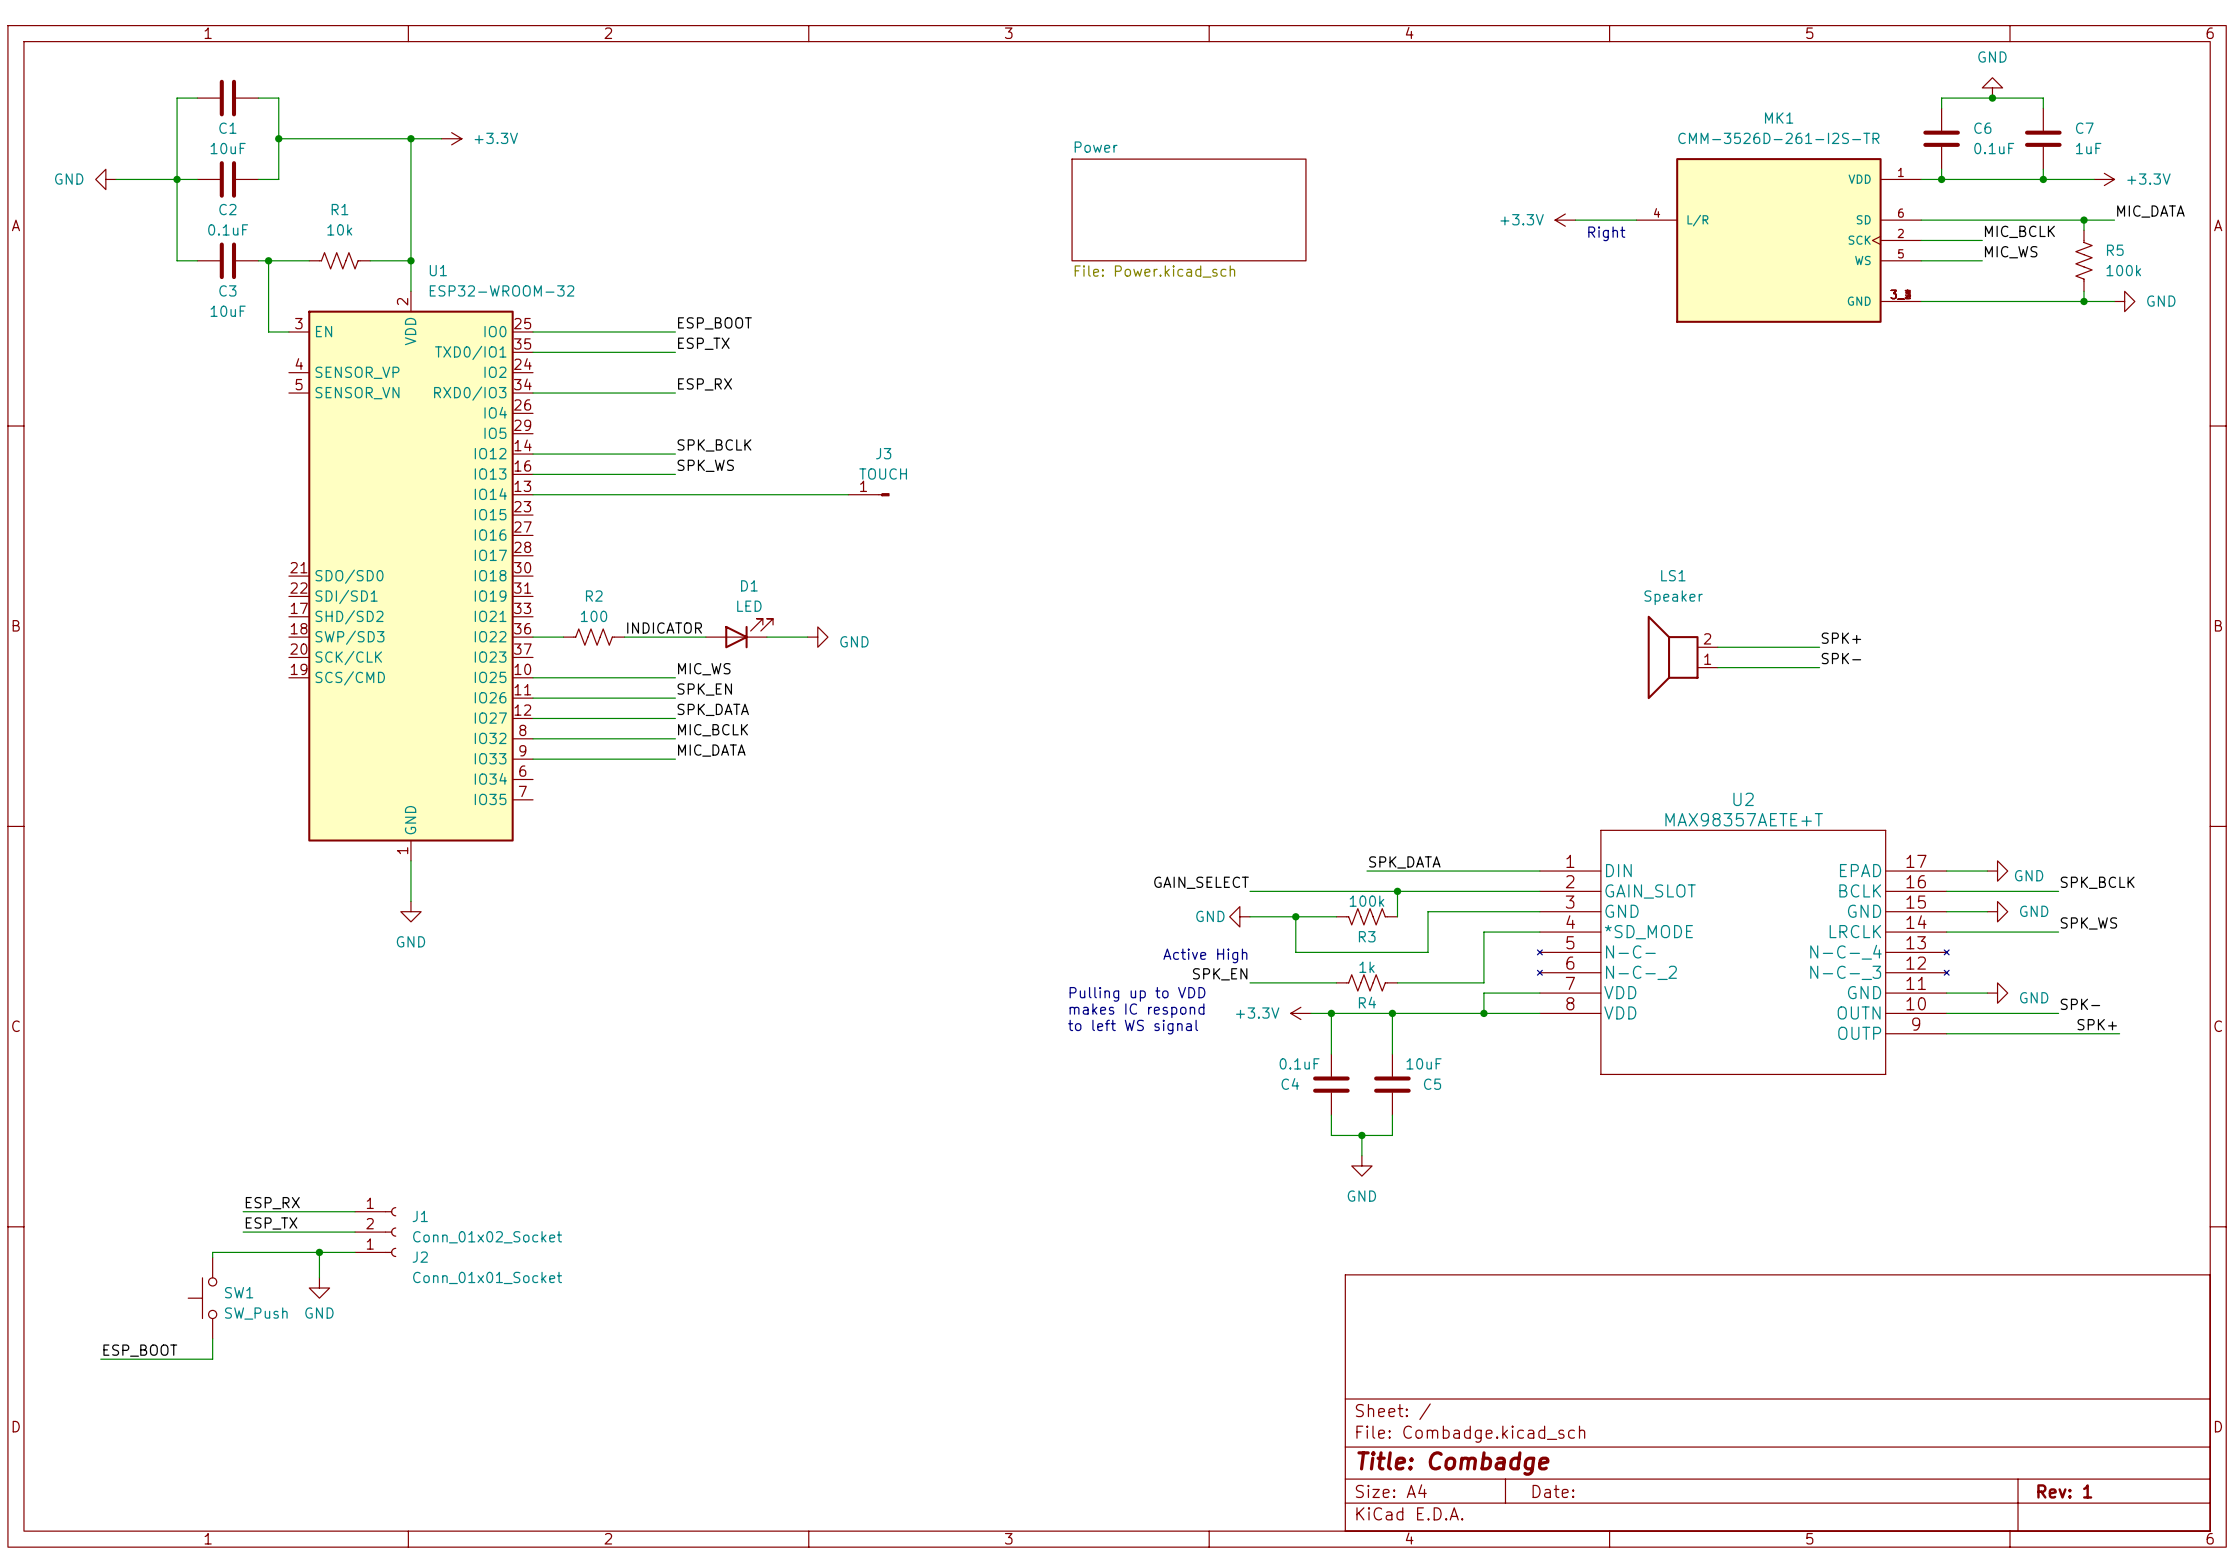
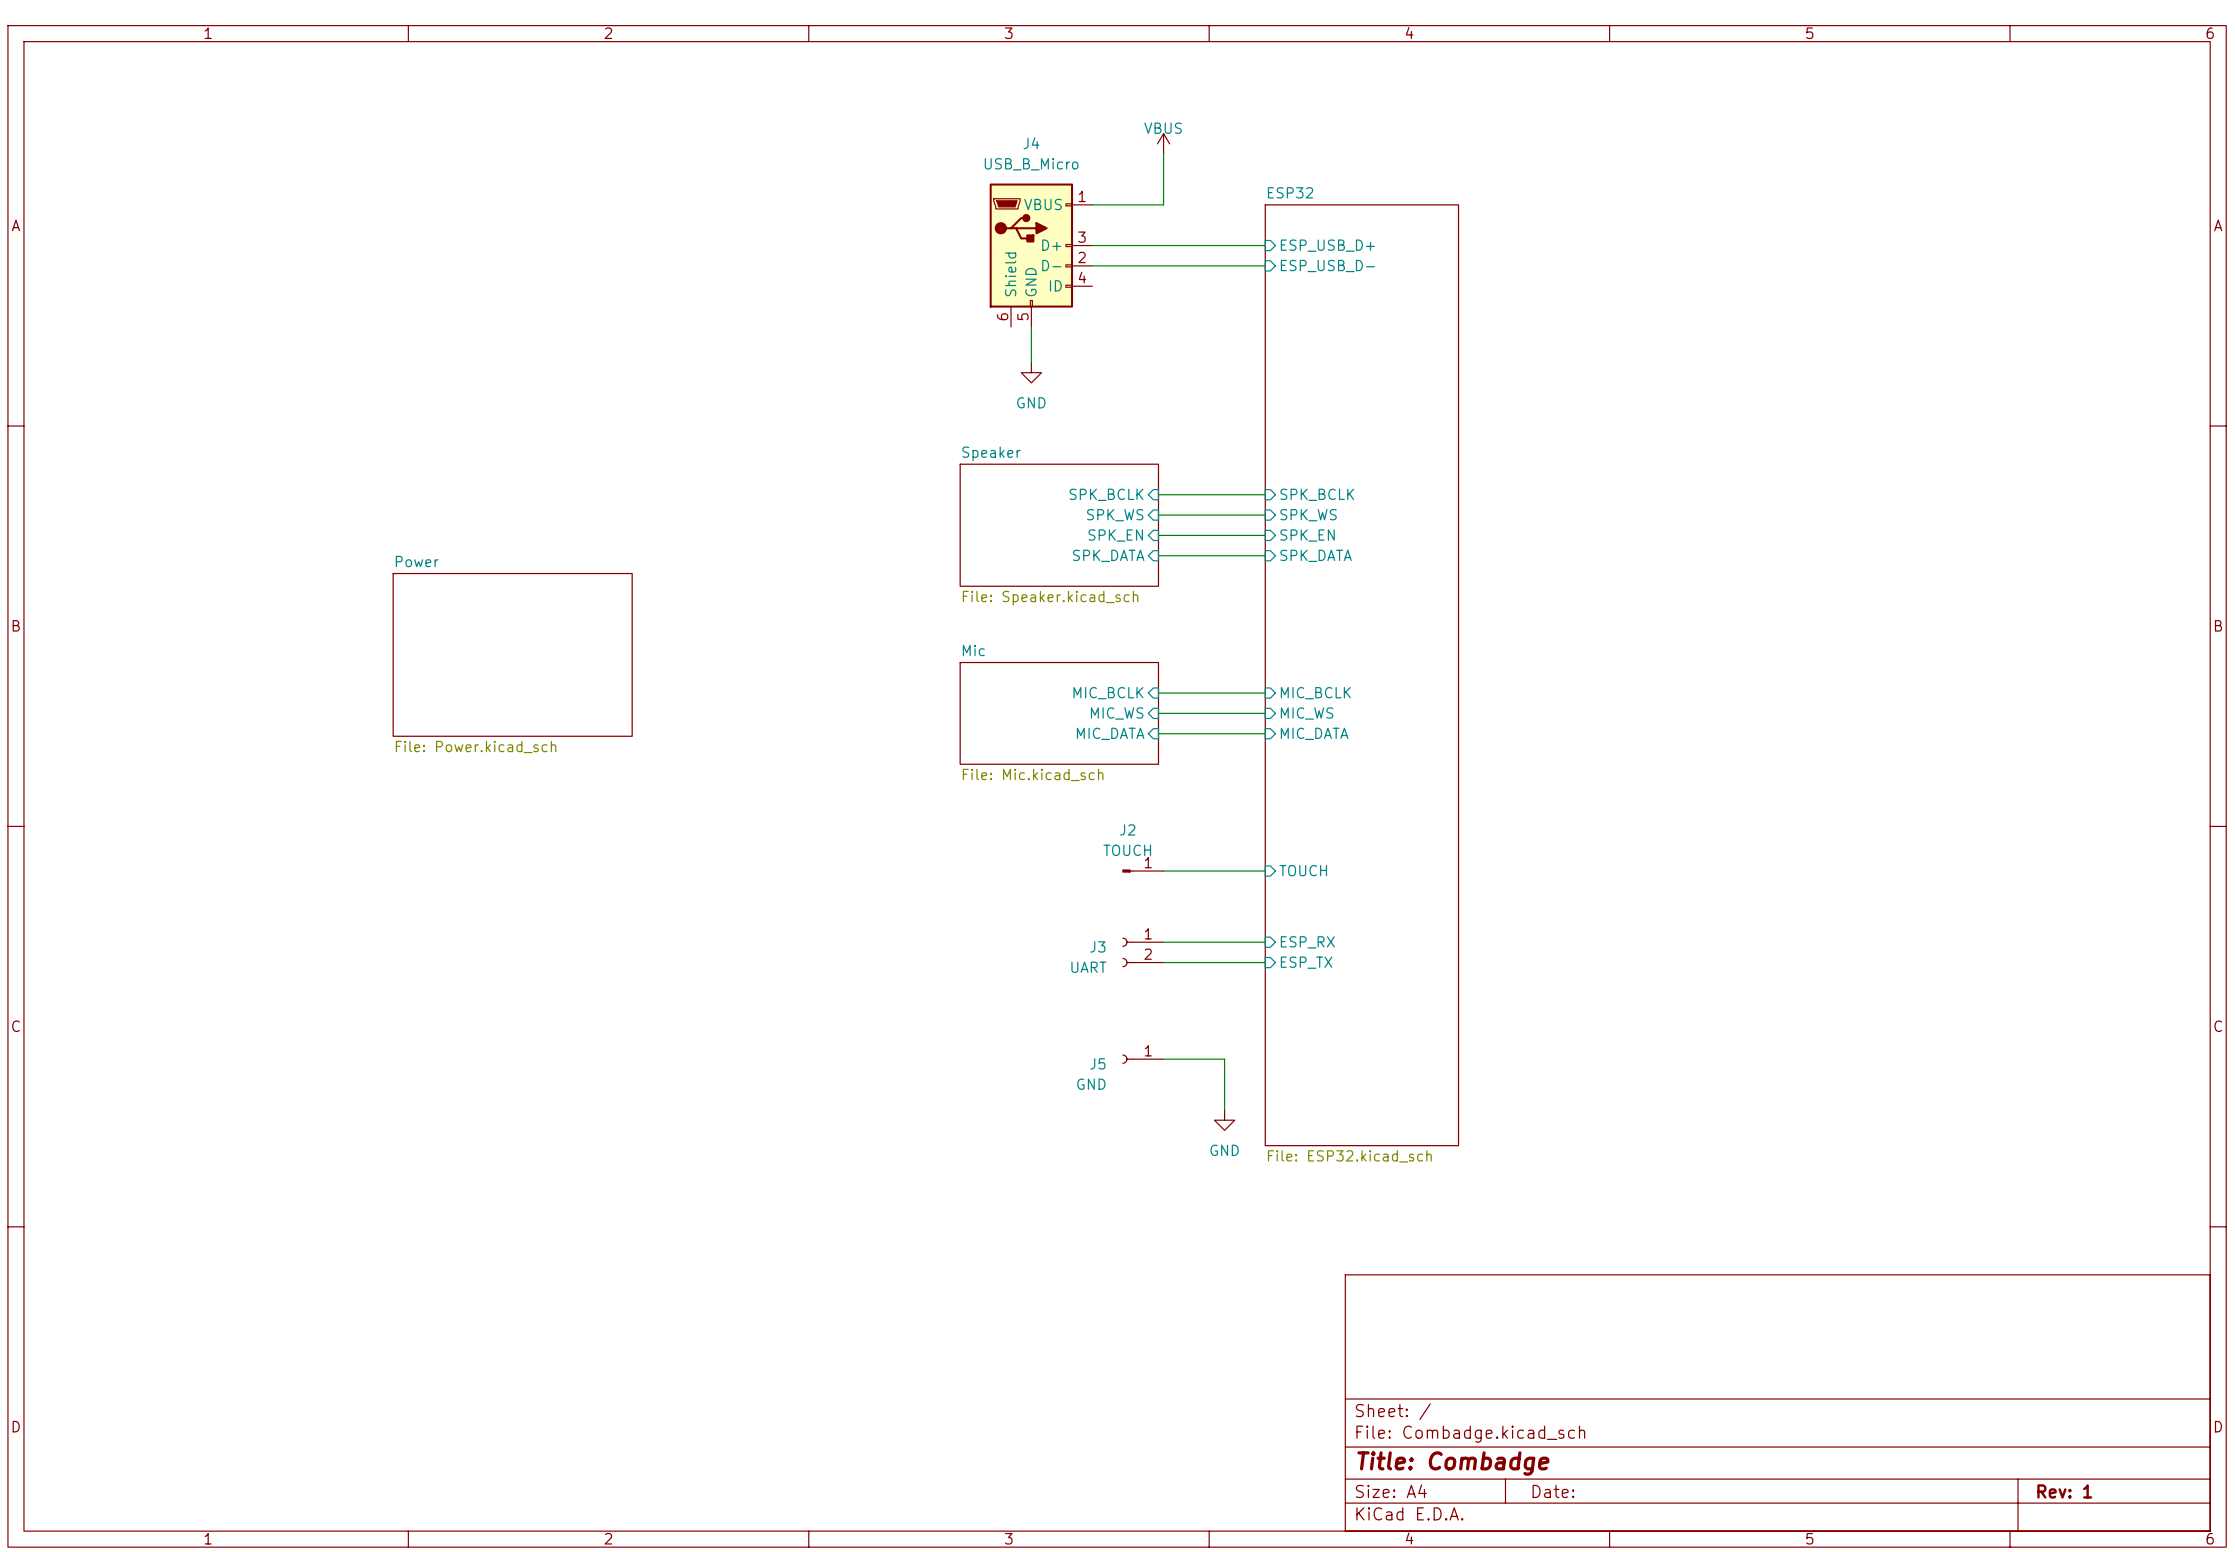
power symbol: GND (1992, 87) -> none
wire: (197, 98) (177, 98) (177, 260) (197, 260) -> none
C1: 10uF (227, 98) -> none
wire: (258, 98) (278, 98) (278, 179) (258, 179) -> none
junction: (1992, 98) -> none
wire: (1941, 108) (1941, 98) (2043, 98) (2043, 108) -> none
wire: (278, 138) (441, 138) -> none
junction: (278, 138) -> none
wire: (410, 138) (410, 291) -> none
junction: (410, 138) -> none
power symbol: +3.3V (451, 138) -> none
C6: 0.1uF (1941, 138) -> none
C7: 1uF (2043, 138) -> none
power symbol: none -> VBUS (1163, 143)
wire: none -> (1163, 154) (1163, 204) (1092, 204)
wire: (1941, 169) (1941, 179) -> none
wire: (2043, 169) (2043, 179) -> none
power symbol: GND (105, 179) -> none
wire: (116, 179) (197, 179) -> none
junction: (177, 179) -> none
C2: 0.1uF (227, 179) -> none
wire: (1921, 179) (2094, 179) -> none
junction: (1941, 179) -> none
junction: (2043, 179) -> none
power symbol: +3.3V (2104, 179) -> none
sheet Power: File: Power.kicad_sch (1189, 209) -> none
label: MIC_DATA (2150, 211) -> none
power symbol: +3.3V (1565, 220) -> none
wire: (1575, 220) (1636, 220) -> none
wire: (1921, 220) (2114, 220) -> none
wire: (2083, 220) (2083, 230) -> none
junction: (2083, 220) -> none
label: MIC_BCLK (2019, 231) -> none
text: Right (1606, 233) -> none
MK1: CMM-3526D-261-I2S-TR (1778, 240) -> none
wire: (1921, 240) (1982, 240) -> none
wire: none -> (1092, 245) (1265, 245)
sheet pin: none -> ESP_USB_D+ (1327, 245)
label: MIC_WS (2011, 252) -> none
J4: none -> USB_B_Micro (1041, 255)
C3: 10uF (227, 260) -> none
wire: (258, 260) (309, 260) -> none
wire: (268, 260) (268, 331) (288, 331) -> none
junction: (268, 260) -> none
R1: 10k (339, 260) -> none
wire: (370, 260) (410, 260) -> none
junction: (410, 260) -> none
wire: (1921, 260) (1982, 260) -> none
R5: 100k (2083, 260) -> none
wire: none -> (1092, 265) (1265, 265)
sheet pin: none -> ESP_USB_D- (1327, 265)
wire: (2083, 291) (2083, 301) -> none
wire: (1921, 301) (2114, 301) -> none
junction: (2083, 301) -> none
power symbol: GND (2124, 301) -> none
label: ESP_BOOT (714, 323) -> none
wire: none -> (1031, 326) (1031, 362)
wire: (533, 331) (675, 331) -> none
label: ESP_TX (703, 343) -> none
wire: (533, 352) (675, 352) -> none
power symbol: none -> GND (1031, 372)
label: ESP_RX (705, 384) -> none
wire: (533, 393) (675, 393) -> none
label: SPK_BCLK (714, 445) -> none
J3 name position: J3 (883, 453) -> J3 (1097, 946)
wire: (533, 454) (675, 454) -> none
label: SPK_WS (705, 465) -> none
wire: (533, 474) (675, 474) -> none
J3 value: TOUCH (883, 474) -> UART (1088, 967)
J3 symbol: [848, 493, 890, 497] -> [1122, 937, 1164, 968]
wire: (533, 494) (848, 494) -> none
sheet pin: none -> SPK_BCLK (1106, 494)
wire: none -> (1158, 494) (1265, 494)
sheet pin: none -> SPK_BCLK (1317, 494)
sheet pin: none -> SPK_WS (1115, 515)
wire: none -> (1158, 515) (1265, 515)
sheet pin: none -> SPK_WS (1308, 515)
sheet Speaker: none -> File: Speaker.kicad_sch (1059, 525)
sheet pin: none -> SPK_EN (1115, 535)
wire: none -> (1158, 535) (1265, 535)
sheet pin: none -> SPK_EN (1307, 535)
sheet pin: none -> SPK_DATA (1108, 555)
wire: none -> (1158, 555) (1265, 555)
sheet pin: none -> SPK_DATA (1316, 555)
U1: ESP32-WROOM-32 (410, 576) -> none
label: INDICATOR (664, 628) -> none
D1: LED (739, 633) -> none
wire: (533, 637) (563, 637) -> none
R2: 100 (594, 637) -> none
wire: (624, 637) (705, 637) -> none
wire: (766, 637) (807, 637) -> none
power symbol: GND (817, 637) -> none
label: SPK+ (1841, 638) -> none
wire: (1717, 647) (1819, 647) -> none
sheet Power: none -> File: Power.kicad_sch (512, 654)
LS1: Speaker (1682, 657) -> none
label: SPK- (1841, 658) -> none
wire: (1717, 667) (1819, 667) -> none
label: MIC_WS (704, 669) -> none
sheet ESP32: none -> File: ESP32.kicad_sch (1361, 675)
wire: (533, 677) (675, 677) -> none
label: SPK_EN (704, 689) -> none
sheet pin: none -> MIC_BCLK (1108, 693)
wire: none -> (1158, 693) (1265, 693)
sheet pin: none -> MIC_BCLK (1315, 693)
wire: (533, 698) (675, 698) -> none
label: SPK_DATA (713, 709) -> none
sheet Mic: none -> File: Mic.kicad_sch (1059, 713)
sheet pin: none -> MIC_WS (1117, 713)
wire: none -> (1158, 713) (1265, 713)
sheet pin: none -> MIC_WS (1307, 713)
wire: (533, 718) (675, 718) -> none
label: MIC_BCLK (713, 730) -> none
sheet pin: none -> MIC_DATA (1110, 733)
wire: none -> (1158, 733) (1265, 733)
sheet pin: none -> MIC_DATA (1314, 733)
wire: (533, 738) (675, 738) -> none
label: MIC_DATA (711, 750) -> none
wire: (533, 759) (675, 759) -> none
wire: (410, 860) (410, 901) -> none
label: SPK_DATA (1404, 862) -> none
sheet pin: none -> TOUCH (1303, 870)
wire: none -> (1163, 871) (1265, 871)
wire: (1366, 871) (1539, 871) -> none
wire: (1946, 871) (1987, 871) -> none
power symbol: GND (1997, 871) -> none
label: GAIN_SELECT (1201, 882) -> none
label: SPK_BCLK (2097, 882) -> none
wire: (1250, 891) (1539, 891) -> none
wire: (1397, 891) (1397, 916) -> none
junction: (1397, 891) -> none
wire: (1946, 891) (2058, 891) -> none
power symbol: GND (410, 911) -> none
wire: (1539, 911) (1428, 911) (1428, 952) (1295, 952) (1295, 916) -> none
wire: (1946, 911) (1987, 911) -> none
power symbol: GND (1997, 911) -> none
power symbol: GND (1239, 916) -> none
wire: (1250, 916) (1336, 916) -> none
junction: (1295, 916) -> none
R3: 100k (1366, 916) -> none
label: SPK_WS (2088, 923) -> none
wire: (1539, 932) (1483, 932) (1483, 982) (1397, 982) -> none
wire: (1946, 932) (2058, 932) -> none
wire: none -> (1163, 942) (1265, 942)
sheet pin: none -> ESP_RX (1307, 942)
U2: MAX98357AETE+T (1743, 952) -> none
text: Active High (1205, 955) -> none
wire: none -> (1163, 962) (1265, 962)
sheet pin: none -> ESP_TX (1306, 962)
label: SPK_EN (1220, 974) -> none
wire: (1250, 982) (1336, 982) -> none
R4: 1k (1366, 982) -> none
wire: (1539, 993) (1483, 993) (1483, 1013) -> none
wire: (1946, 993) (1987, 993) -> none
power symbol: GND (1997, 993) -> none
text: Pulling up to VDD (1137, 994) -> none
label: SPK- (2080, 1004) -> none
text: makes IC respond (1137, 1010) -> none
power symbol: +3.3V (1300, 1013) -> none
wire: (1311, 1013) (1539, 1013) -> none
wire: (1331, 1013) (1331, 1054) -> none
junction: (1331, 1013) -> none
wire: (1392, 1013) (1392, 1054) -> none
junction: (1392, 1013) -> none
junction: (1483, 1013) -> none
wire: (1946, 1013) (2058, 1013) -> none
label: SPK+ (2097, 1024) -> none
text: to left WS signal (1133, 1027) -> none
wire: (1946, 1033) (2119, 1033) -> none
J5: none -> GND (1142, 1059)
wire: none -> (1163, 1059) (1224, 1059) (1224, 1110)
C4: 0.1uF (1331, 1084) -> none
C5: 10uF (1392, 1084) -> none
wire: (1331, 1115) (1331, 1135) (1392, 1135) (1392, 1115) -> none
power symbol: none -> GND (1224, 1120)
wire: (1361, 1135) (1361, 1155) -> none
junction: (1361, 1135) -> none
power symbol: GND (1361, 1165) -> none
label: ESP_RX (272, 1203) -> none
wire: (243, 1211) (355, 1211) -> none
J1: Conn_01x02_Socket (375, 1221) -> none
label: ESP_TX (271, 1223) -> none
wire: (243, 1232) (355, 1232) -> none
J2 symbol: [355, 1247, 397, 1258] -> [1122, 869, 1164, 873]
wire: (319, 1252) (319, 1277) -> none
junction: (319, 1252) -> none
wire: (355, 1252) (212, 1252) (212, 1257) -> none
J2 name position: J2 (420, 1257) -> J2 (1127, 829)
J2 value: Conn_01x01_Socket (487, 1277) -> TOUCH (1127, 850)
power symbol: GND (319, 1288) -> none
SW1: SW_Push (202, 1298) -> none
wire: (212, 1338) (212, 1359) (100, 1359) -> none
label: ESP_BOOT (140, 1350) -> none

